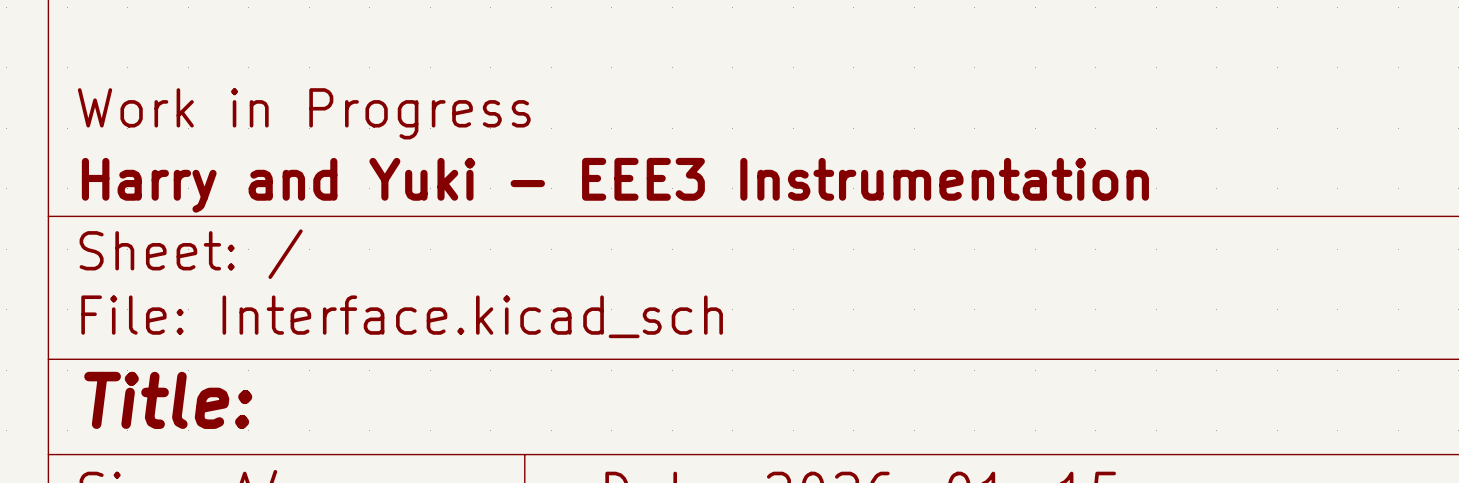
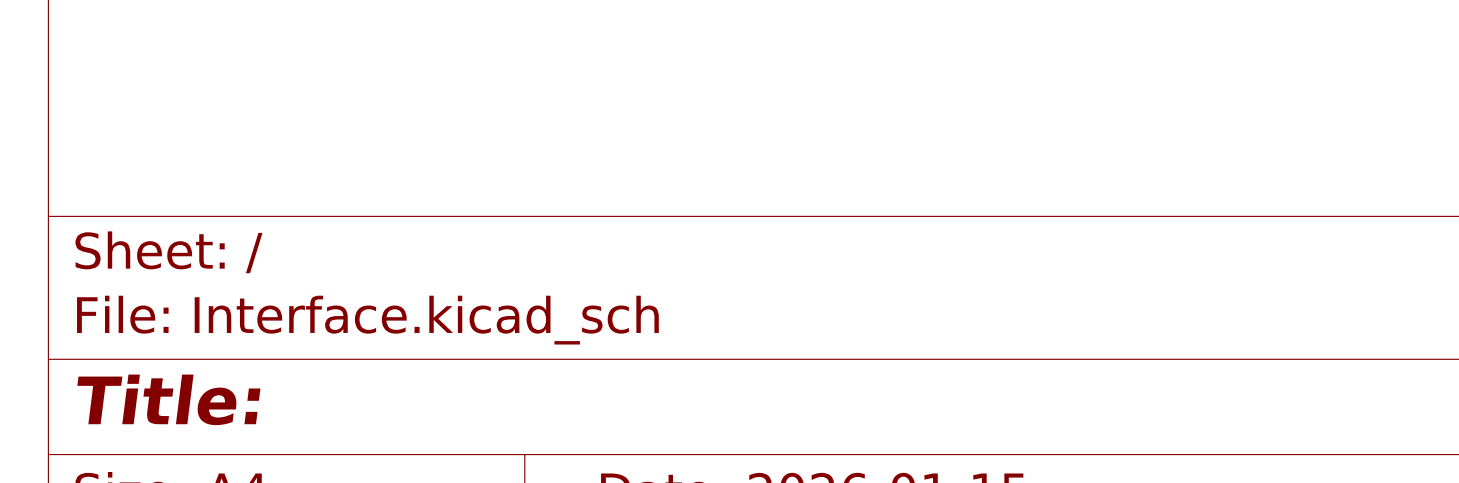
title block: Work in Progress (304, 113) -> none
title block: Harry and Yuki - EEE3 Instrumentation (615, 185) -> none

